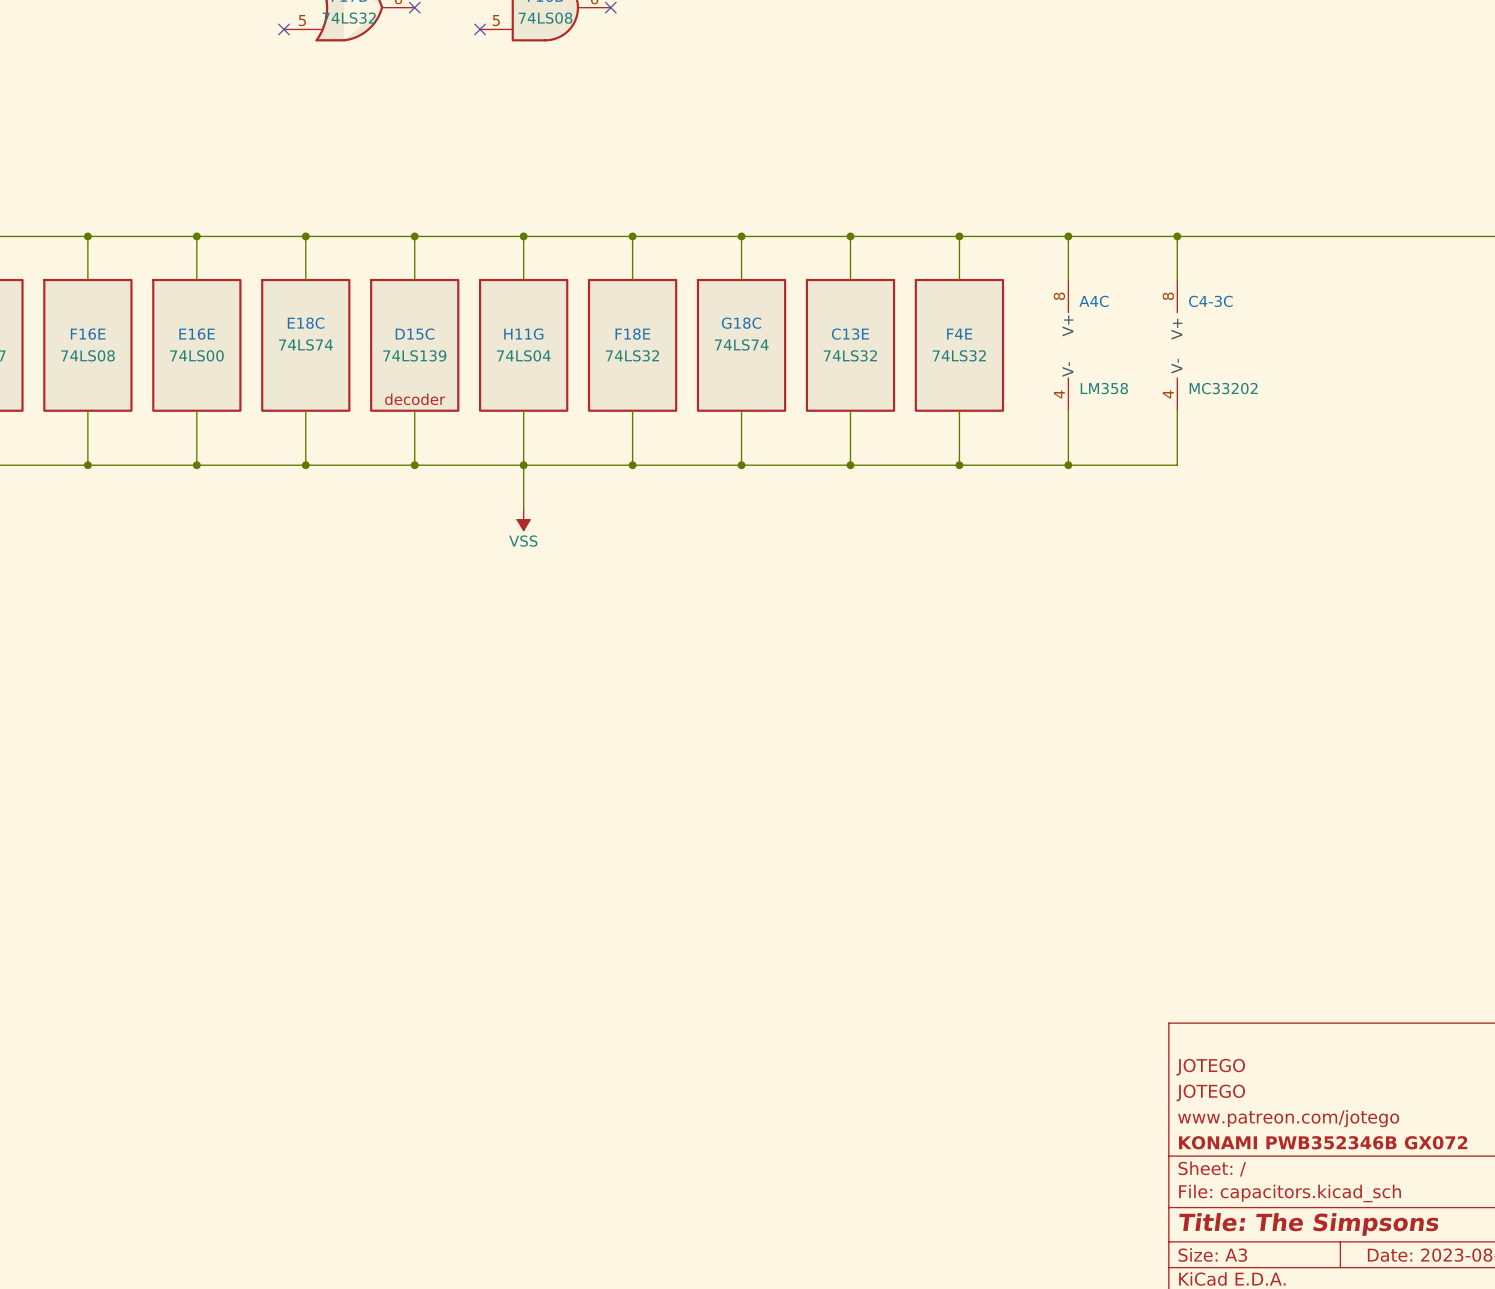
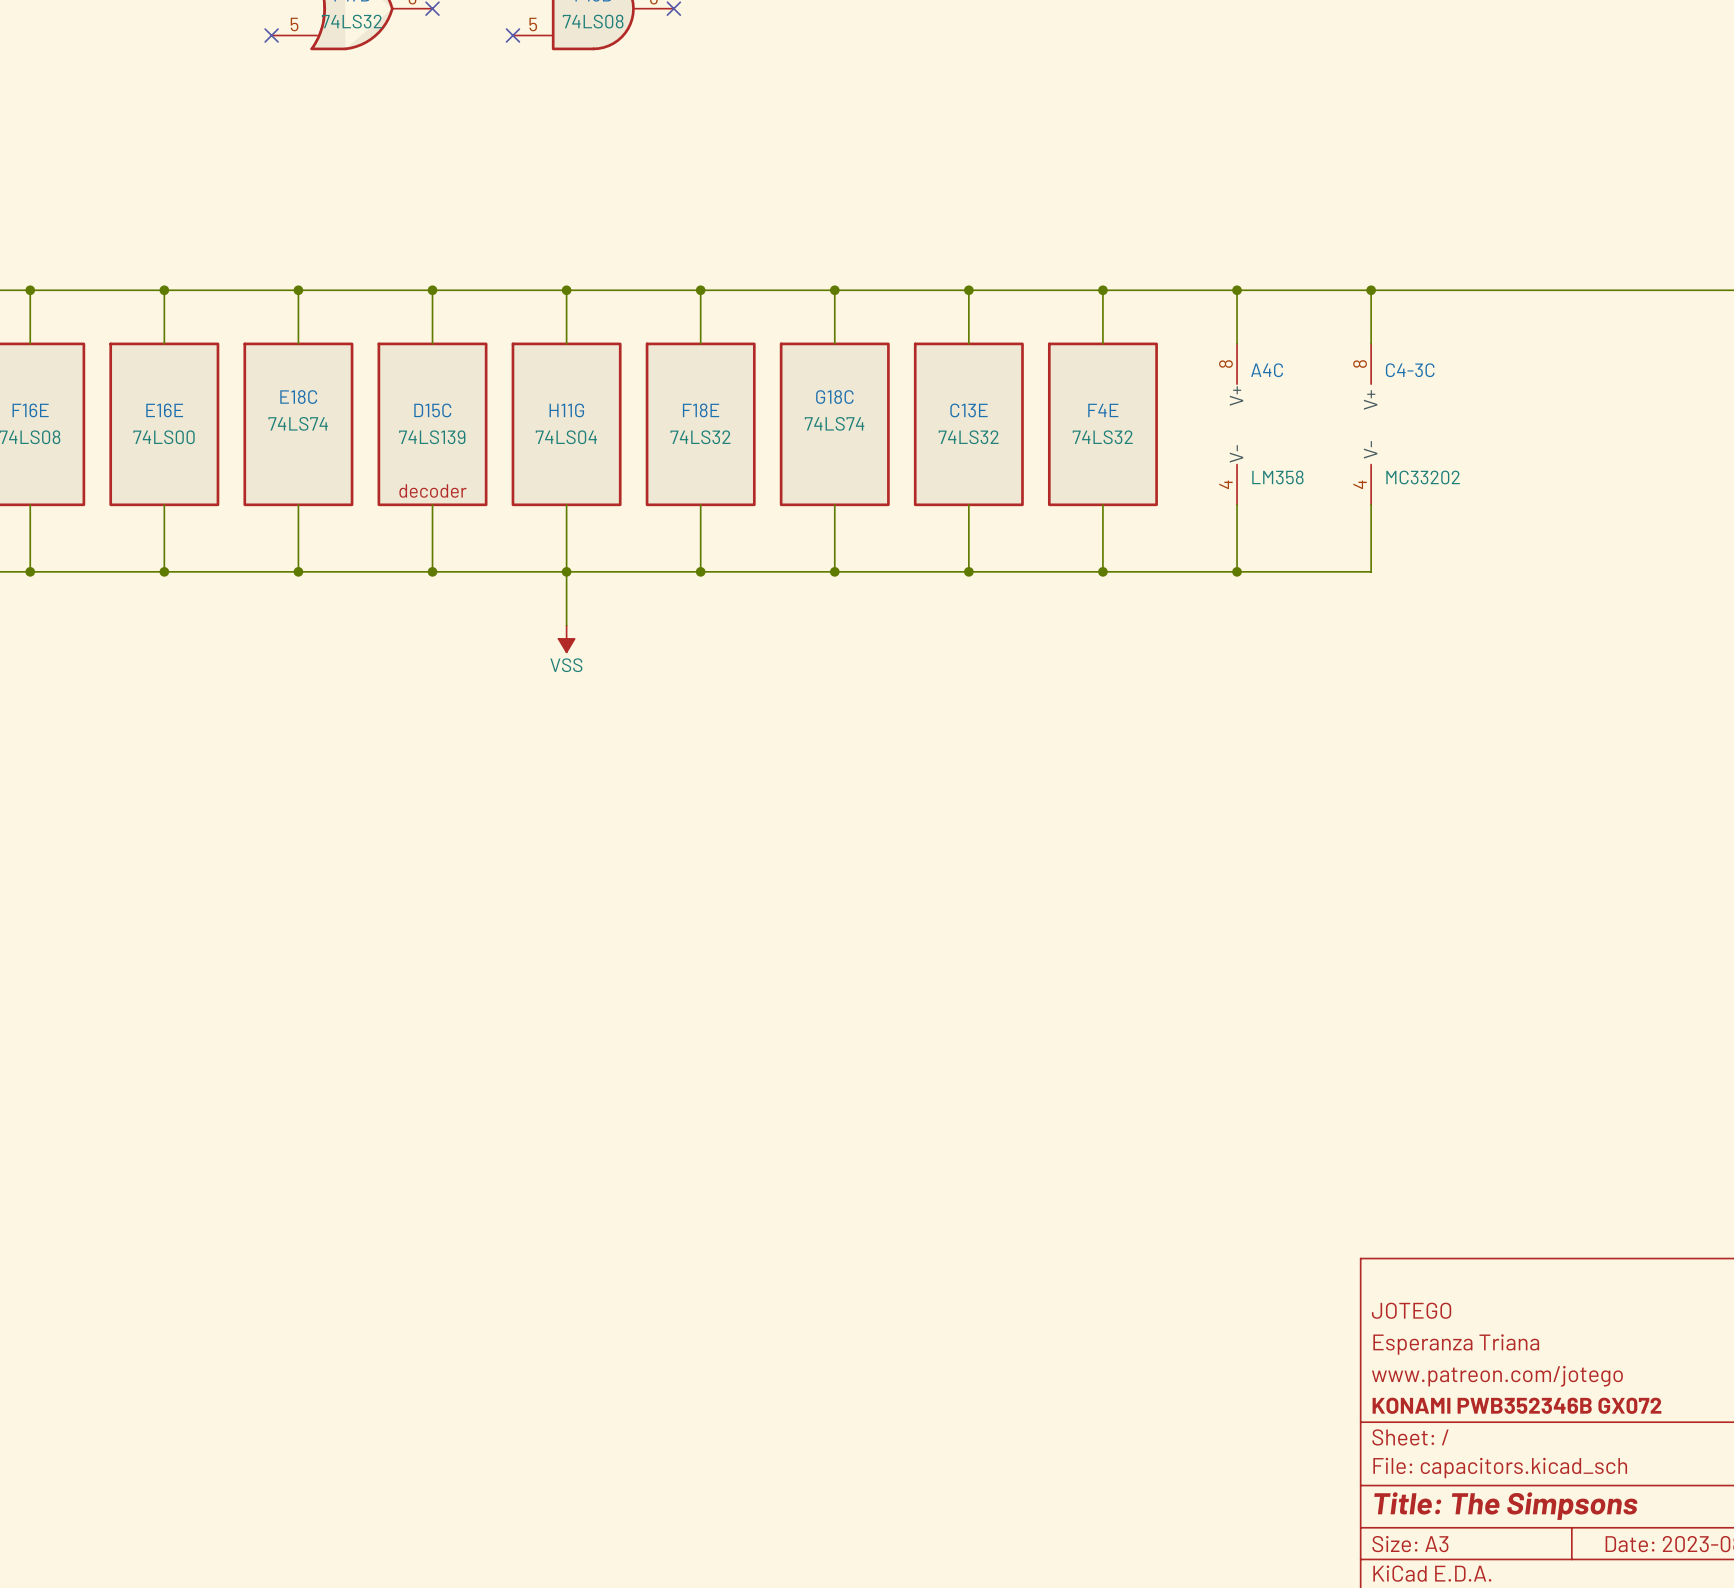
title block: JOTEGO (1210, 1092) -> Esperanza Triana (1456, 1344)

